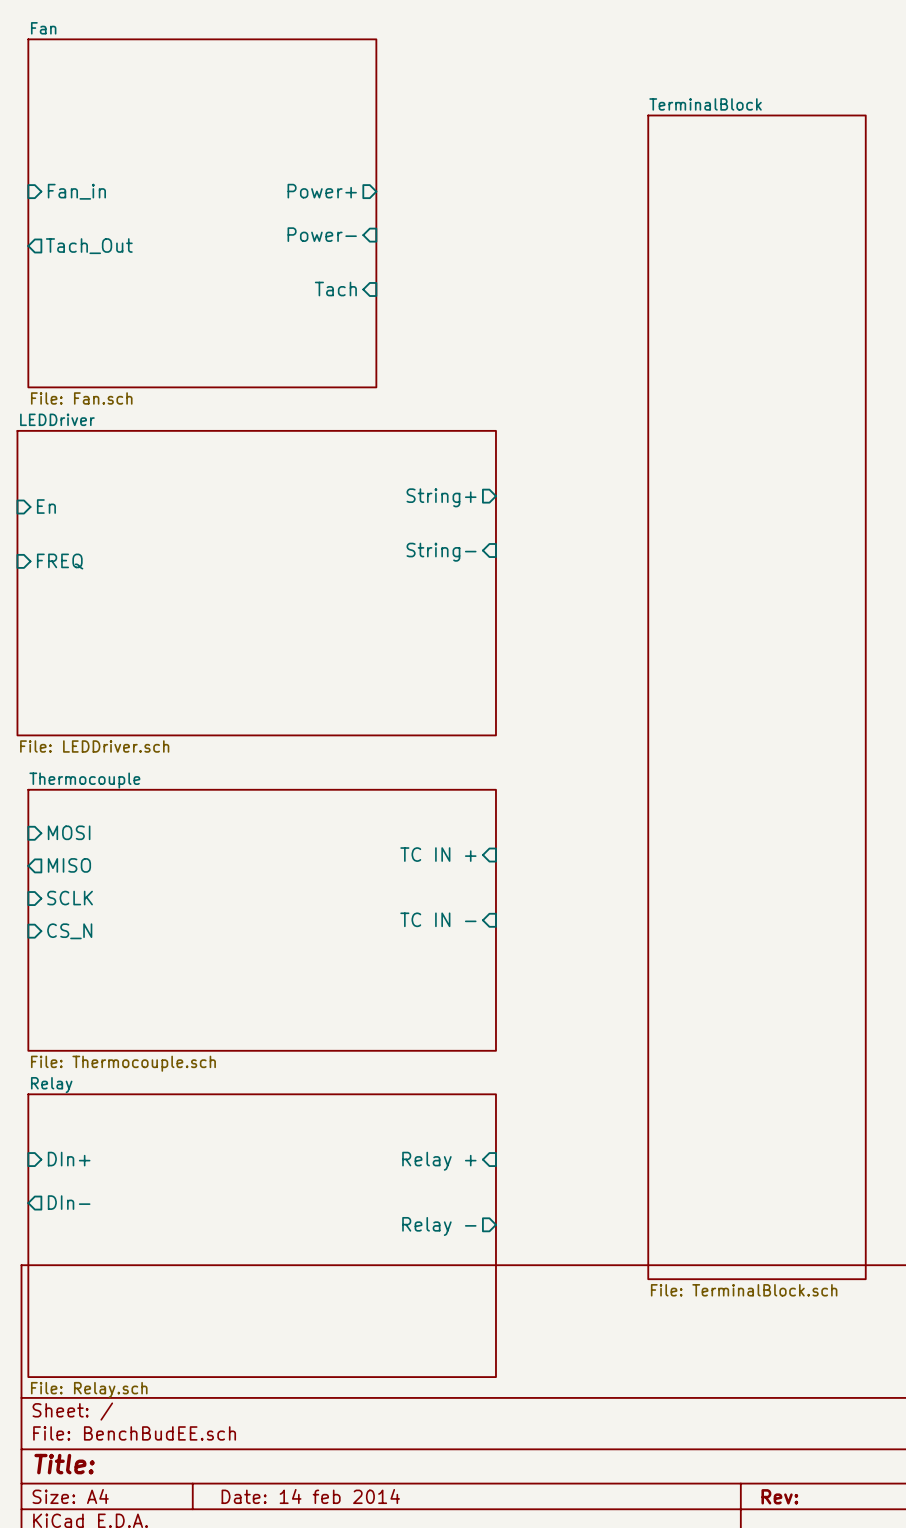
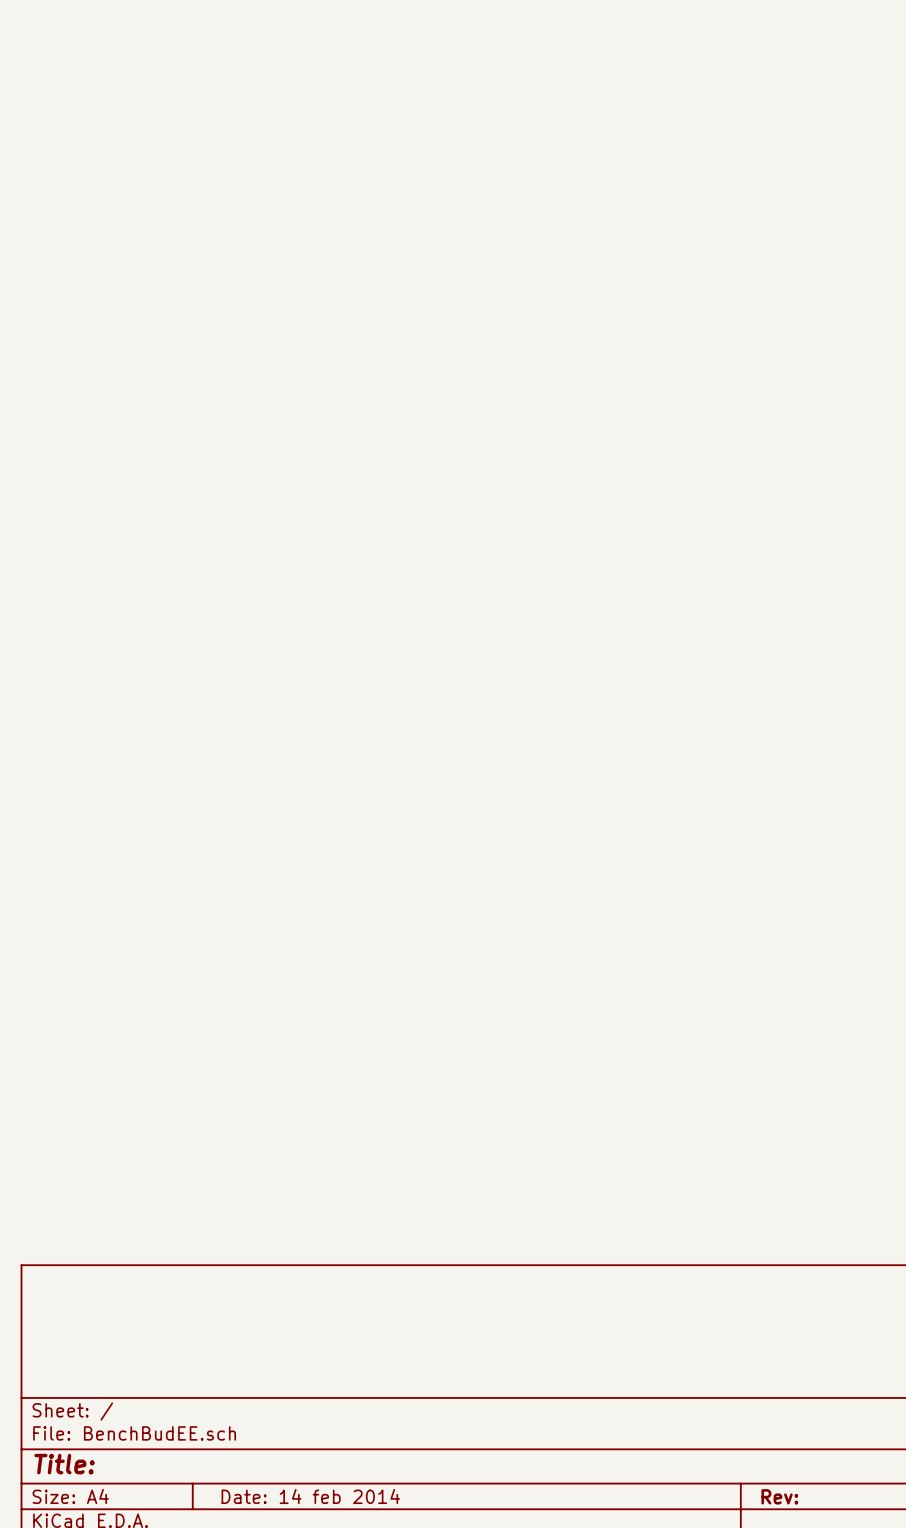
sheet pin: Fan_in (76, 191) -> none
sheet pin: Power+ (322, 191) -> none
sheet Fan: File: Fan.sch (202, 213) -> none
sheet pin: Power- (322, 234) -> none
sheet pin: Tach_Out (89, 246) -> none
sheet pin: Tach (335, 289) -> none
sheet pin: String+ (441, 497) -> none
sheet pin: En (46, 506) -> none
sheet pin: String- (441, 552) -> none
sheet pin: FREQ (60, 561) -> none
sheet LEDDriver: File: LEDDriver.sch (256, 583) -> none
sheet TerminalBlock: File: TerminalBlock.sch (757, 697) -> none
sheet pin: MOSI (69, 832) -> none
sheet pin: TC IN + (438, 854) -> none
sheet pin: MISO (69, 865) -> none
sheet pin: SCLK (70, 898) -> none
sheet pin: TC IN - (438, 919) -> none
sheet Thermocouple: File: Thermocouple.sch (262, 920) -> none
sheet pin: CS_N (69, 931) -> none
sheet pin: DIn+ (69, 1159) -> none
sheet pin: Relay + (439, 1161) -> none
sheet pin: DIn- (69, 1202) -> none
sheet pin: Relay - (439, 1226) -> none
sheet Relay: File: Relay.sch (262, 1235) -> none

